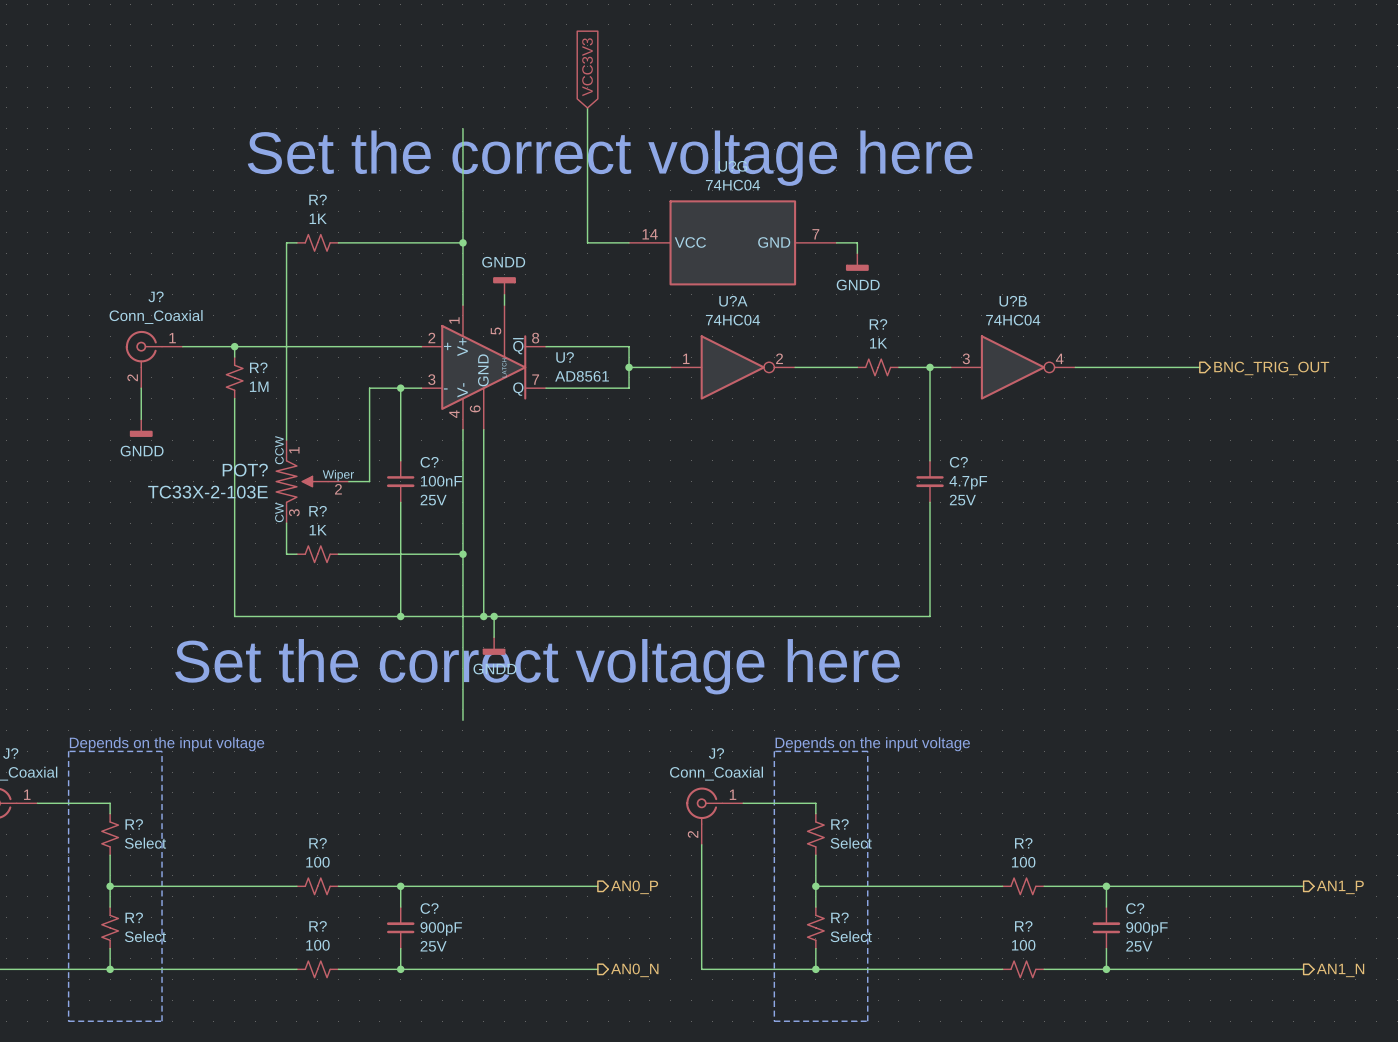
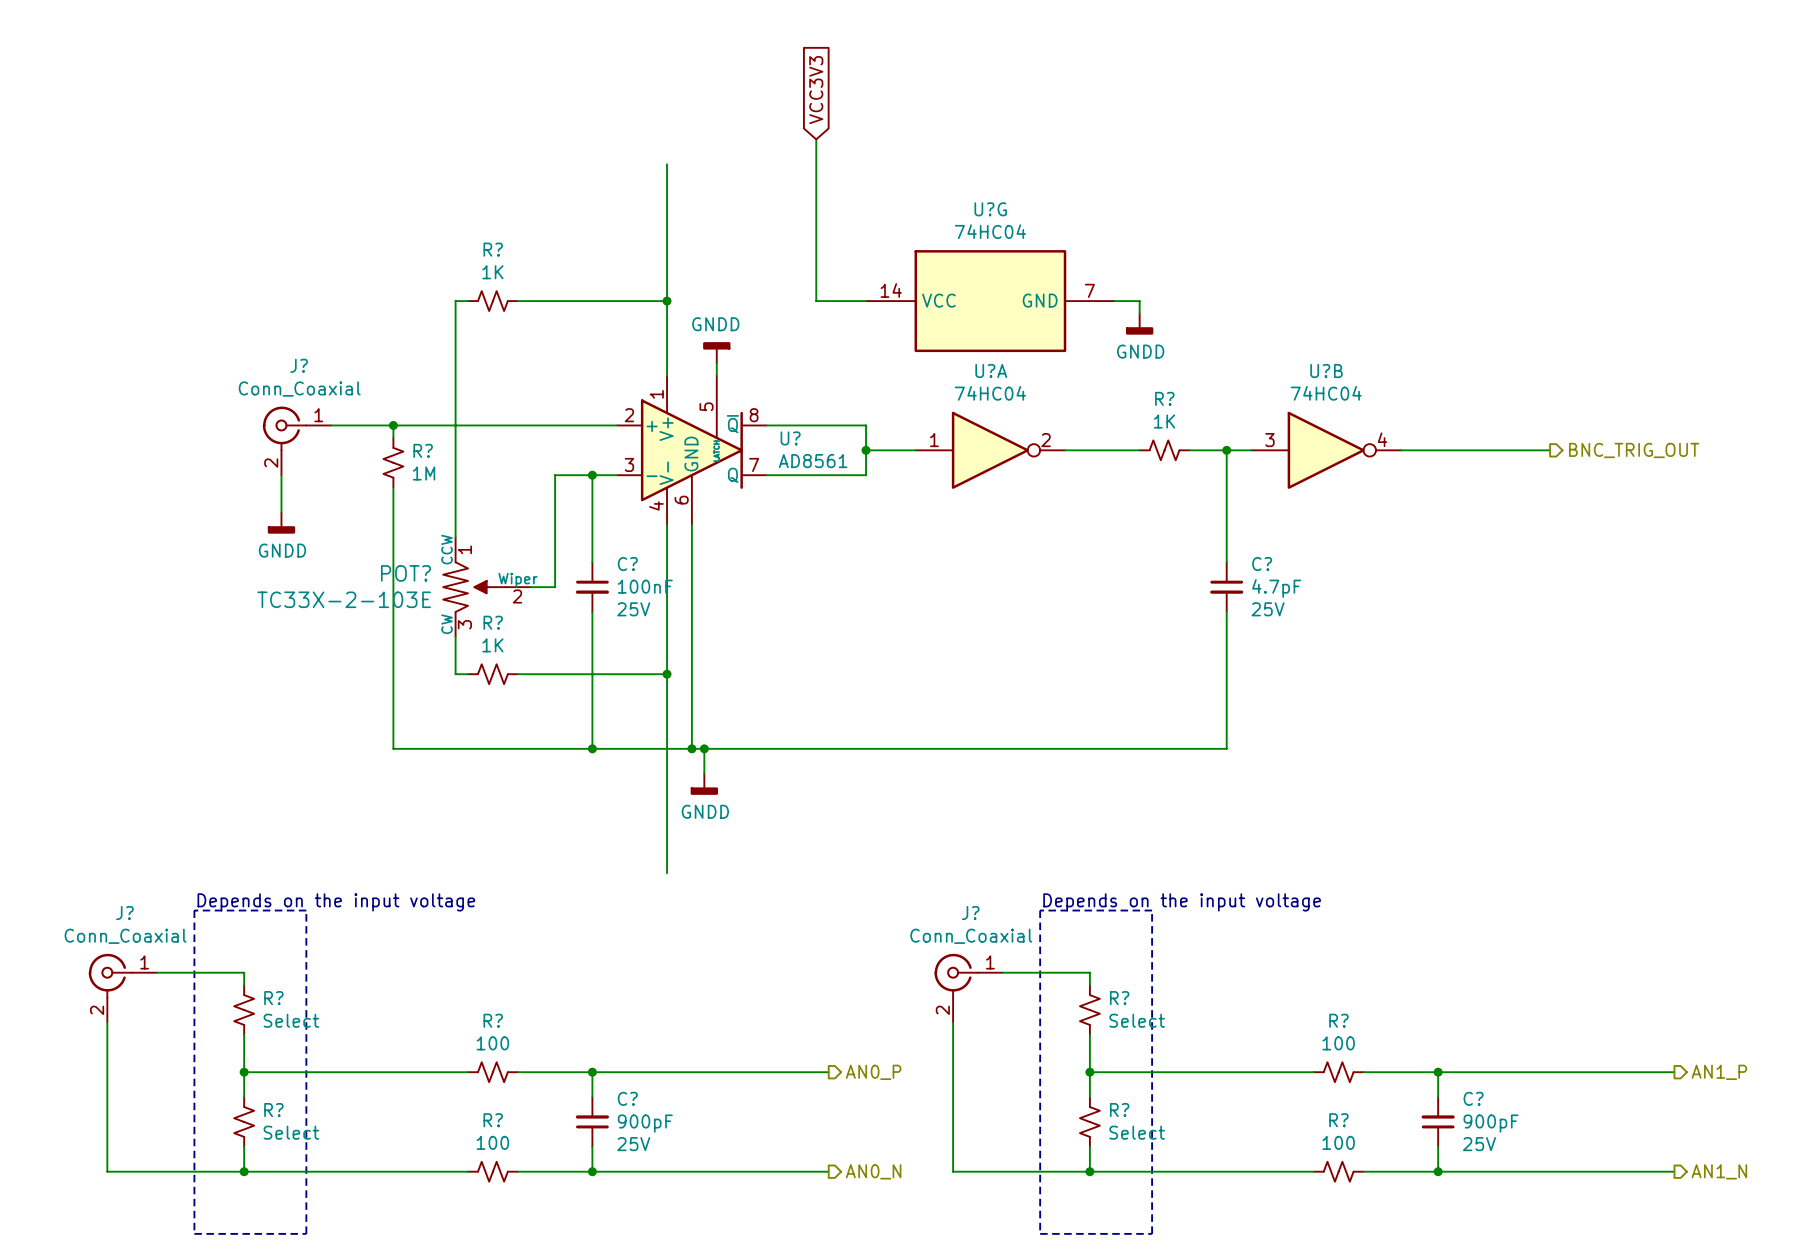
text: Set the correct voltage here (610, 158) -> none
text: Set the correct voltage here (537, 666) -> none

